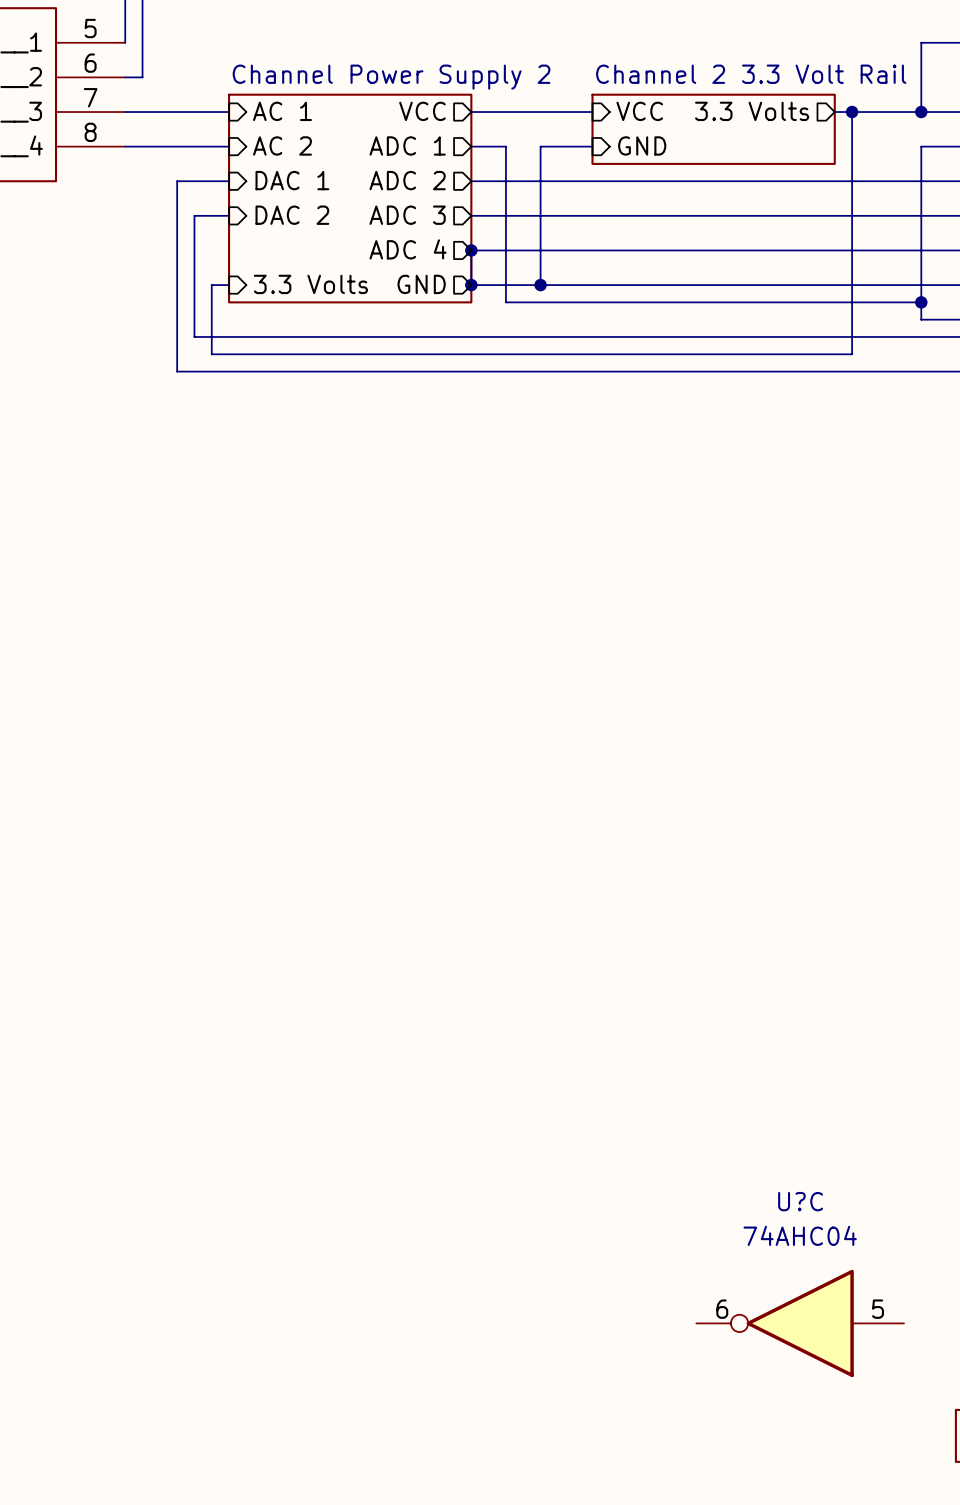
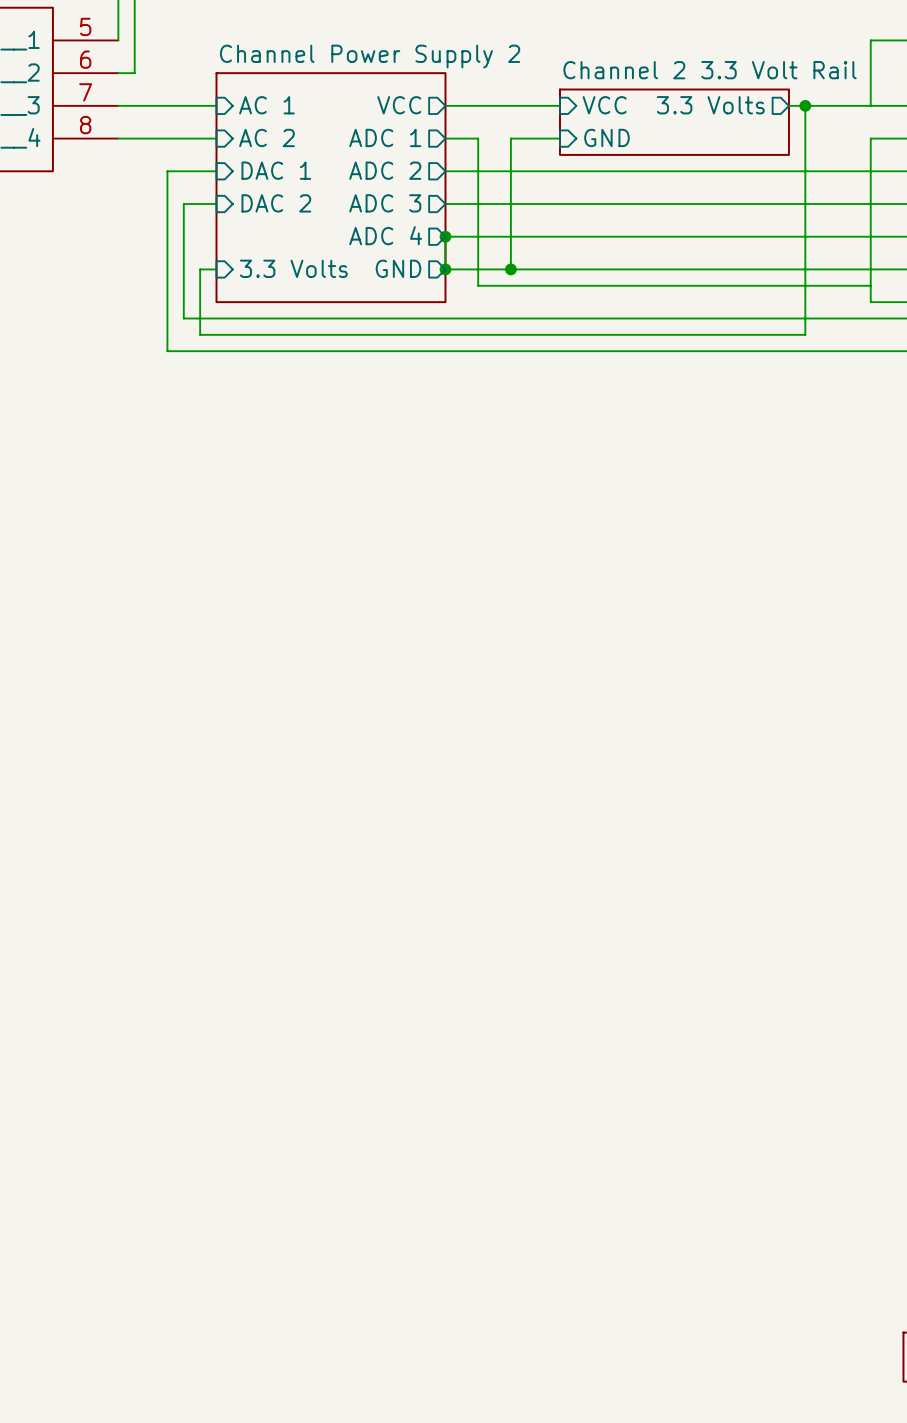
sheet Channel Power Supply 2 shape: [228, 93, 473, 304] -> [215, 72, 447, 304]
junction: (921, 112) -> none
junction: (921, 302) -> none
U?C: 74AHC04 (800, 1323) -> none

